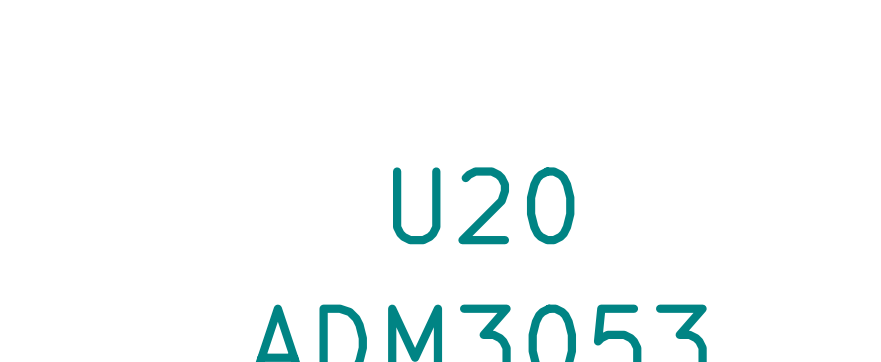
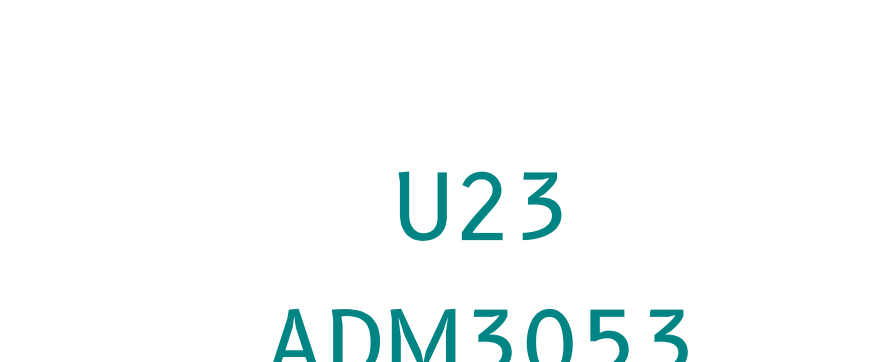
U20 name: U20 (483, 205) -> U23 (479, 206)

